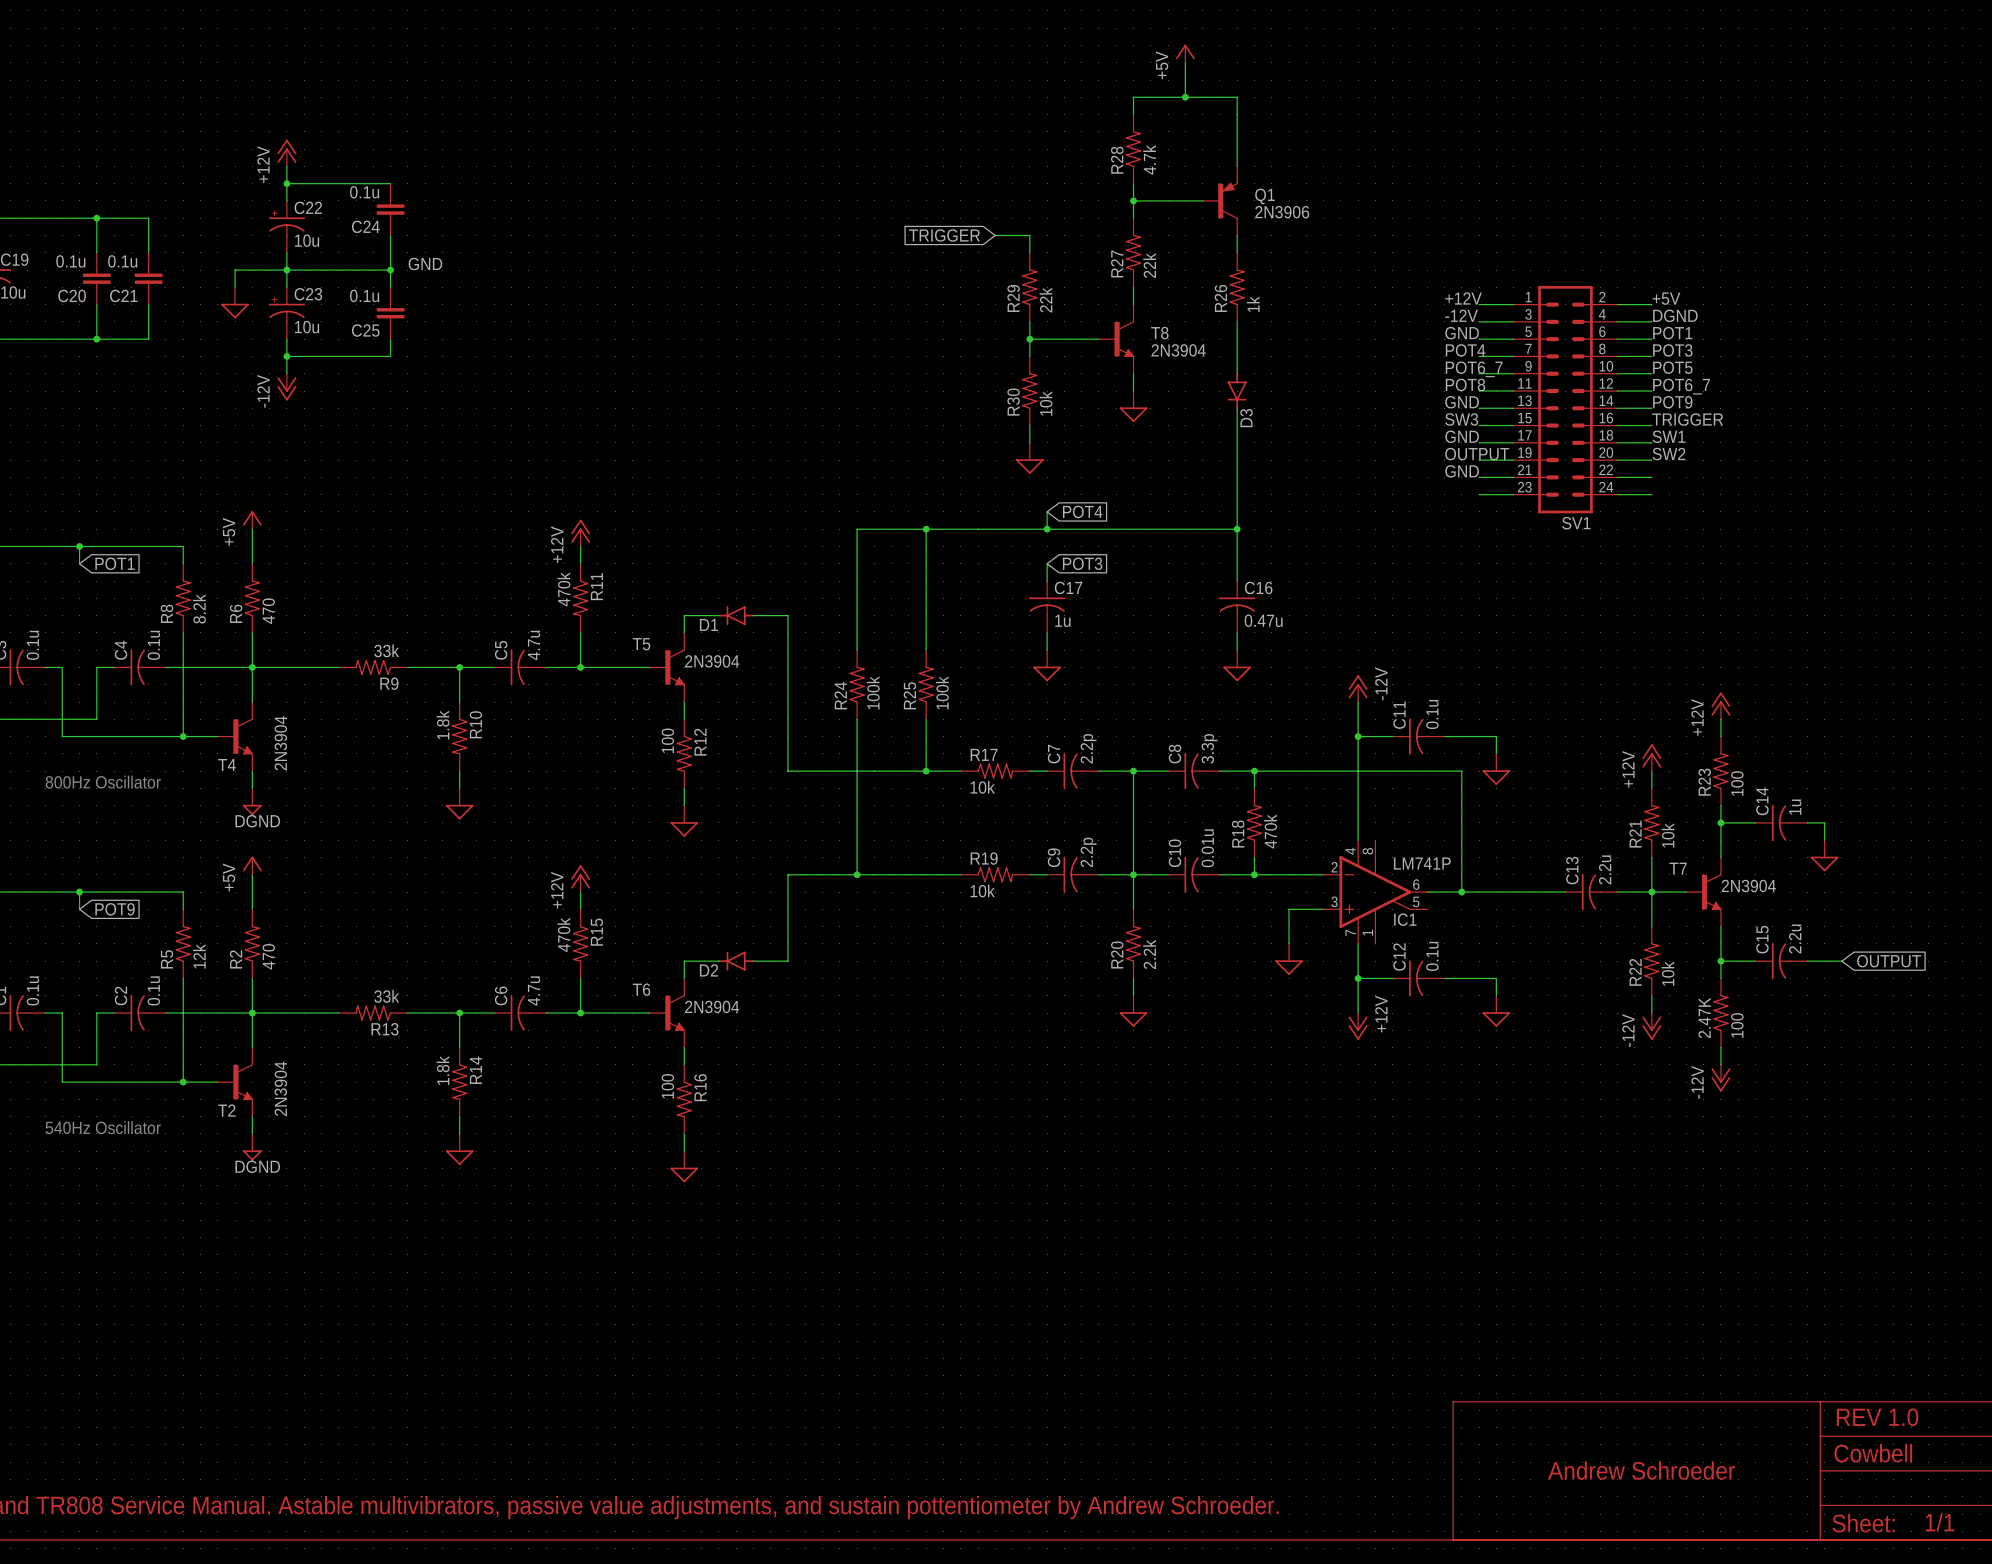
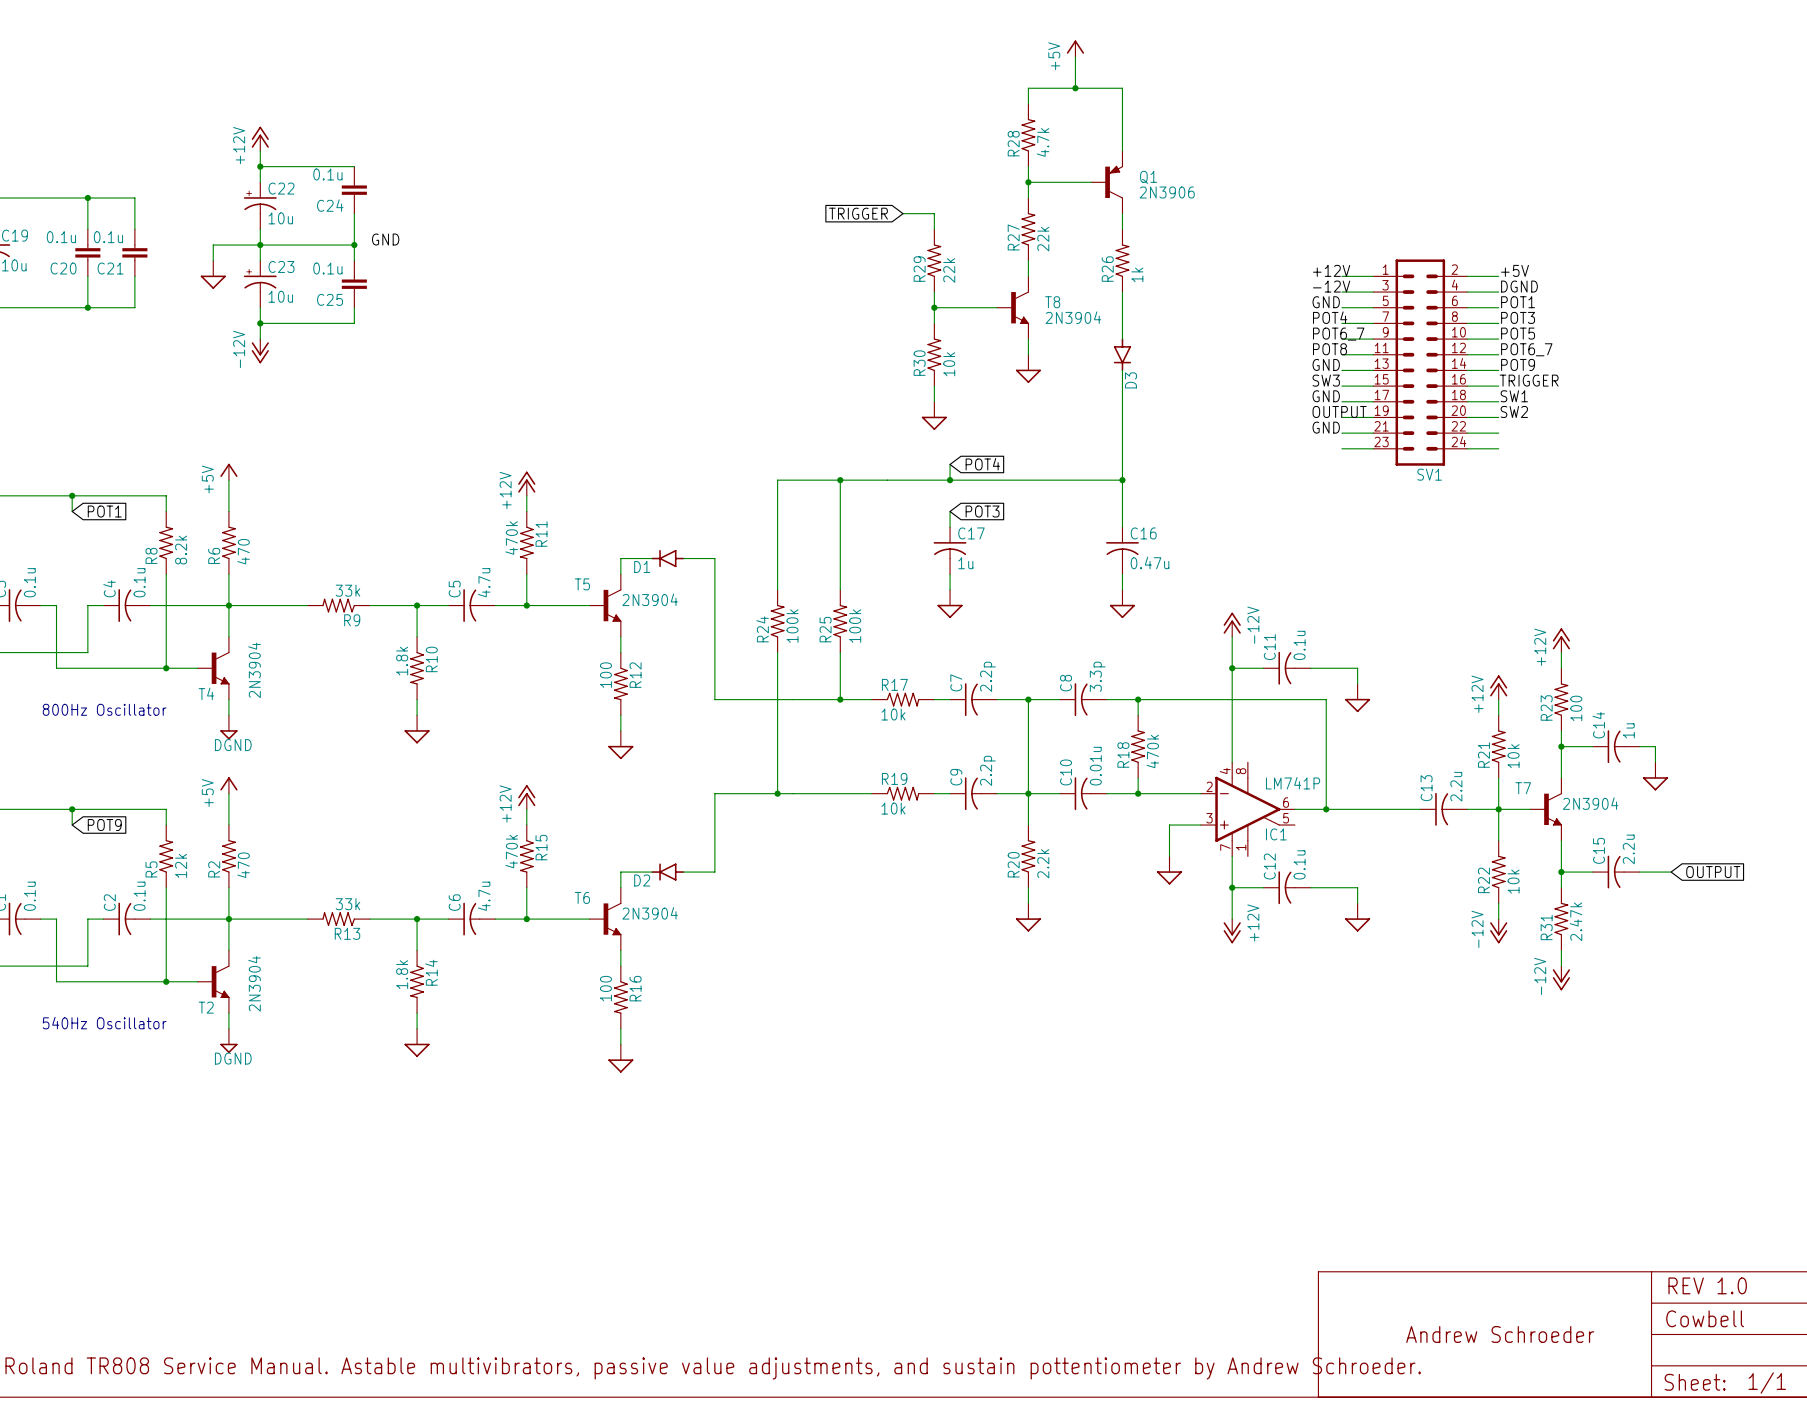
2.47K name: 2.47K (1704, 1017) -> R31 (1546, 927)
2.47K value: 100 (1737, 1025) -> 2.47k (1576, 921)

